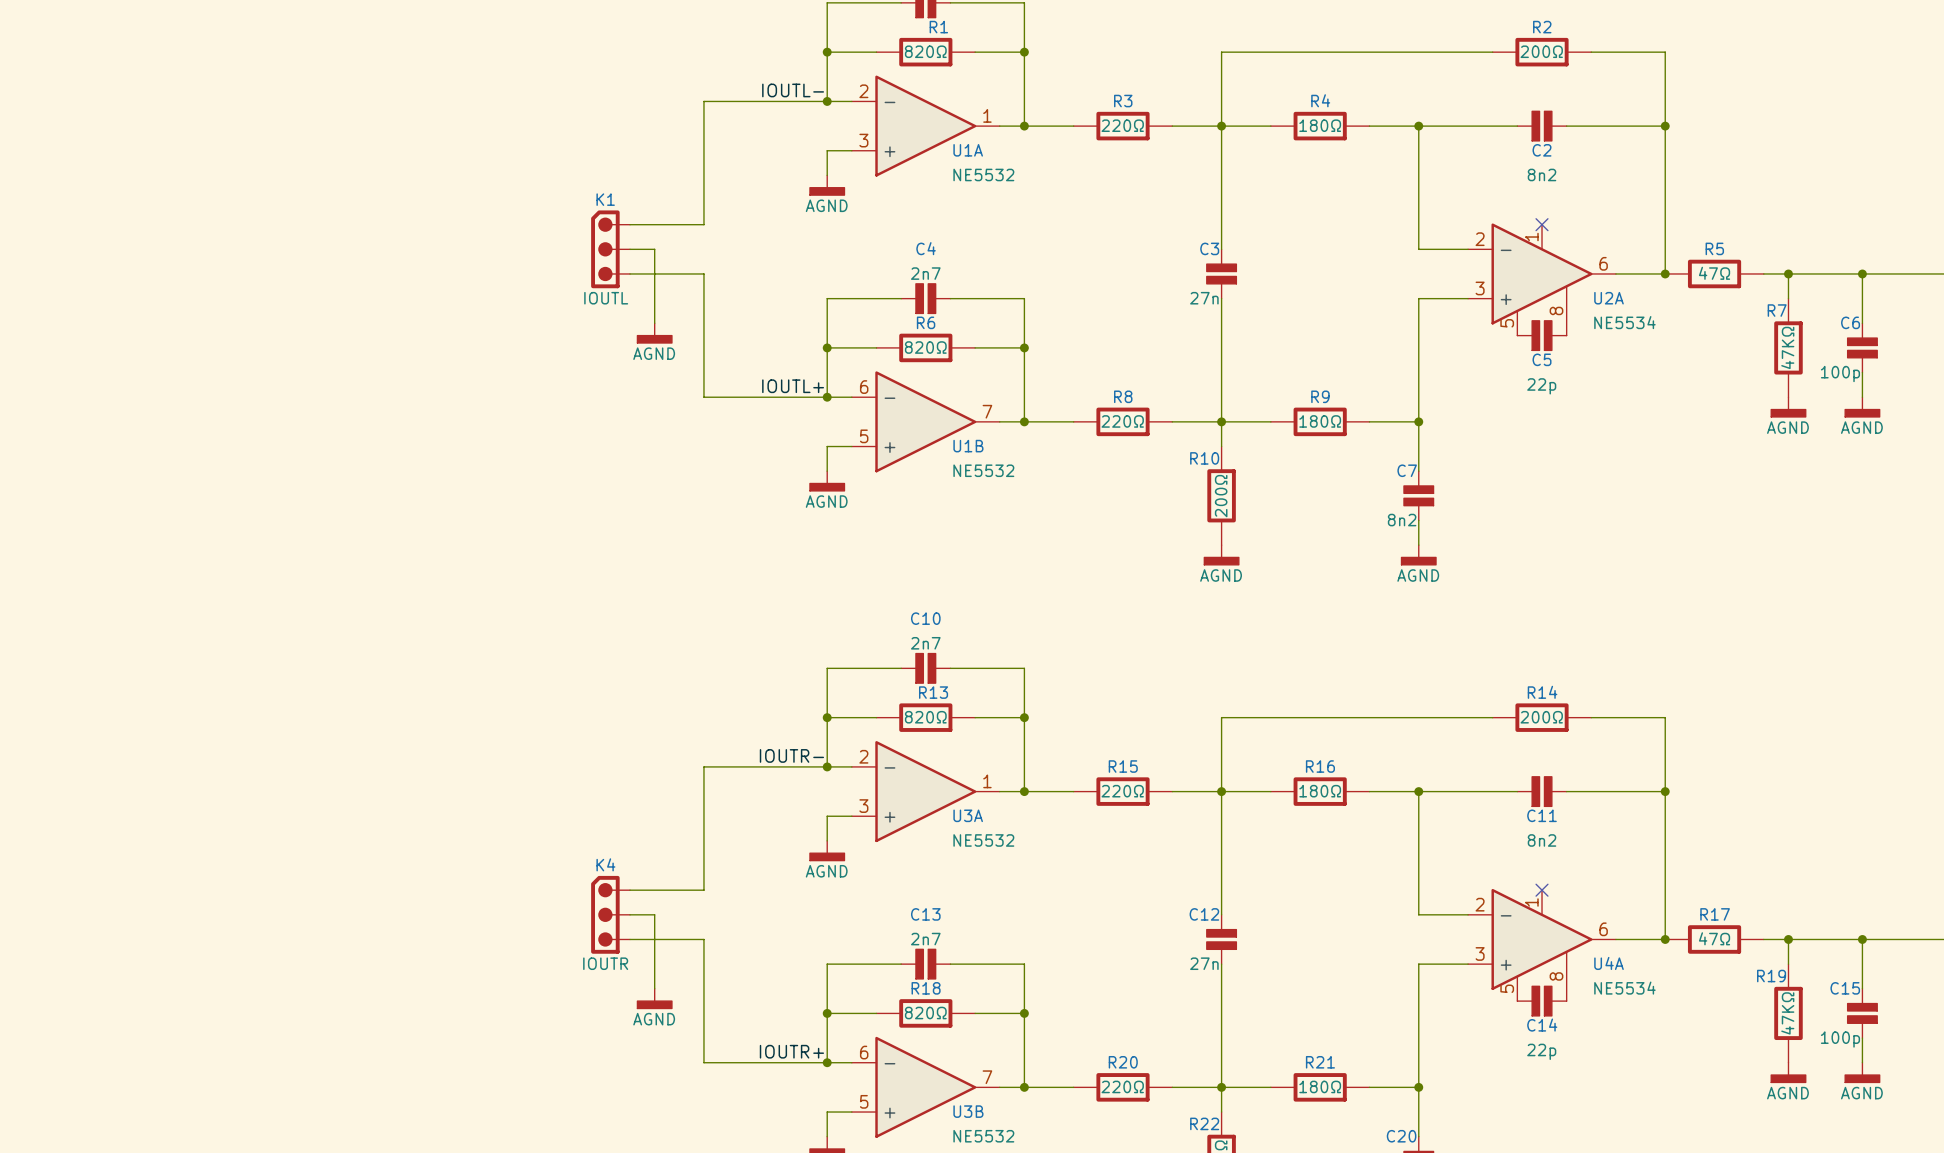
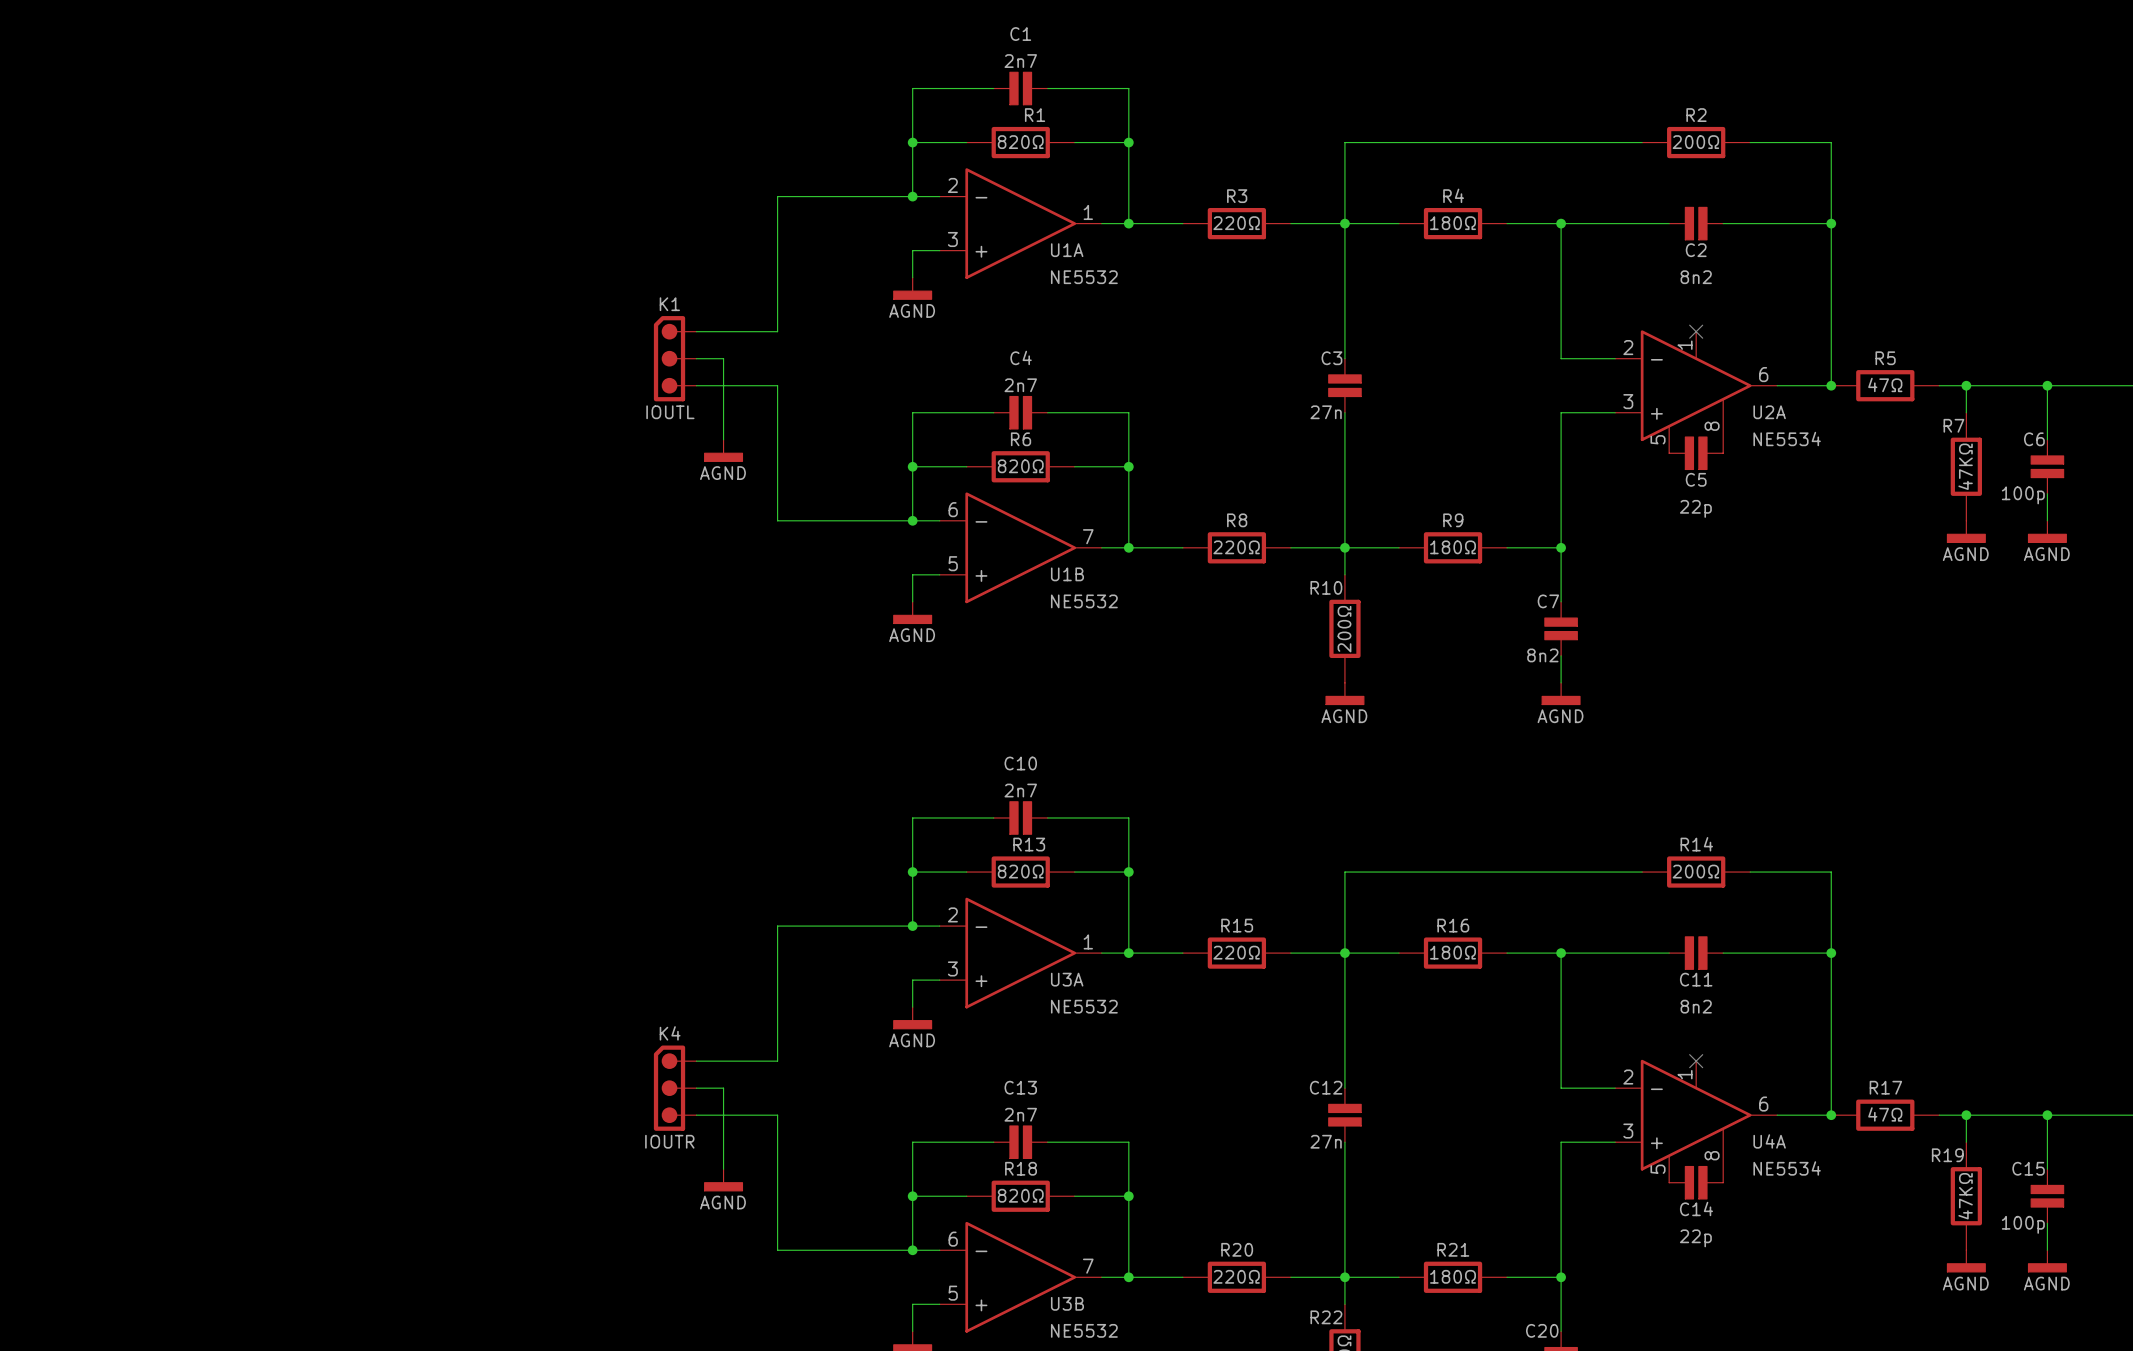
label: IOUTL- (793, 90) -> none
label: IOUTL+ (793, 386) -> none
label: IOUTR- (791, 755) -> none
label: IOUTR+ (791, 1051) -> none

